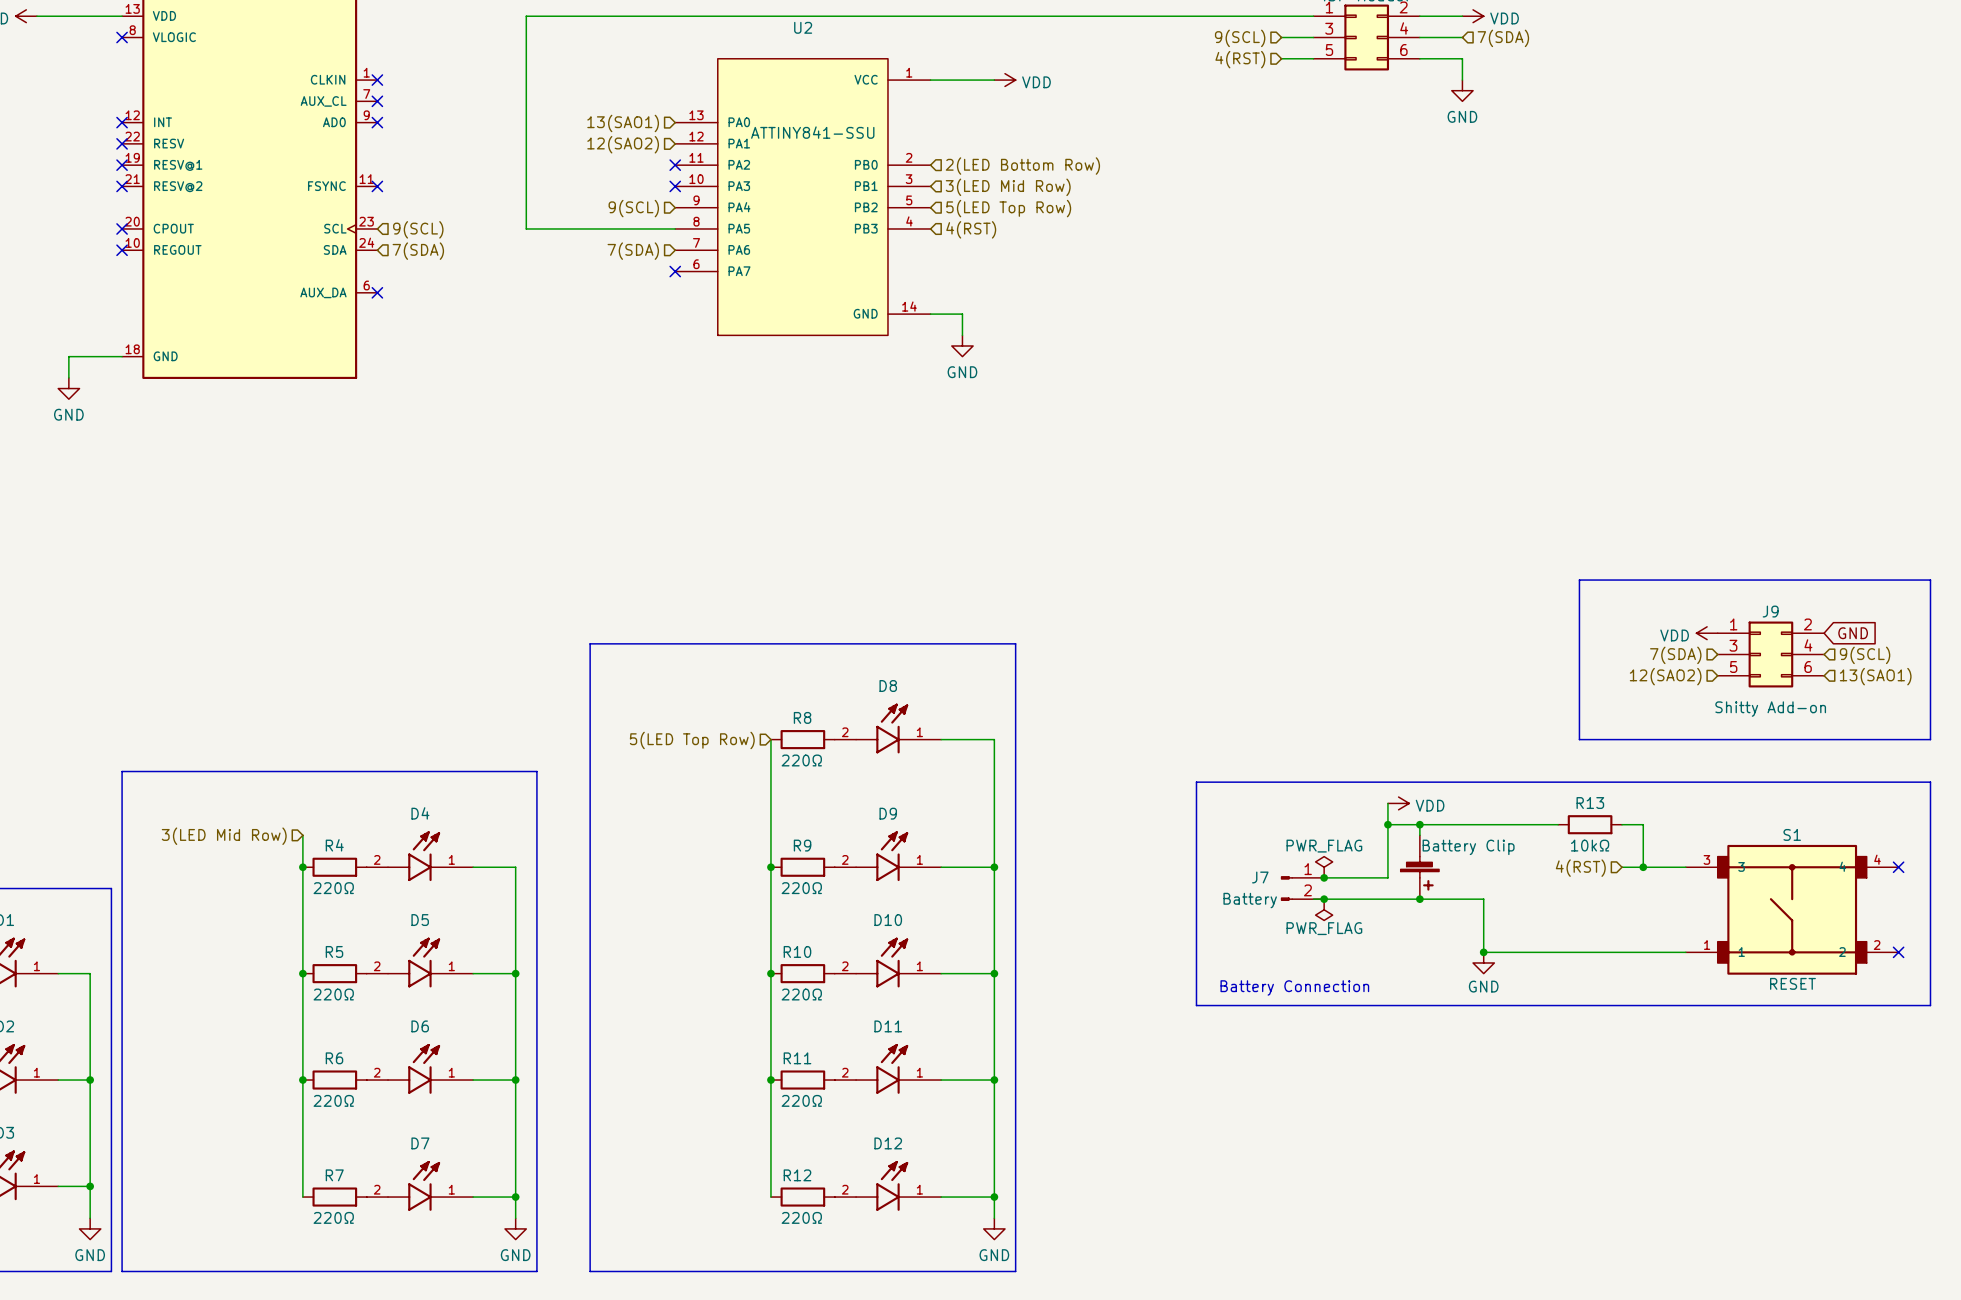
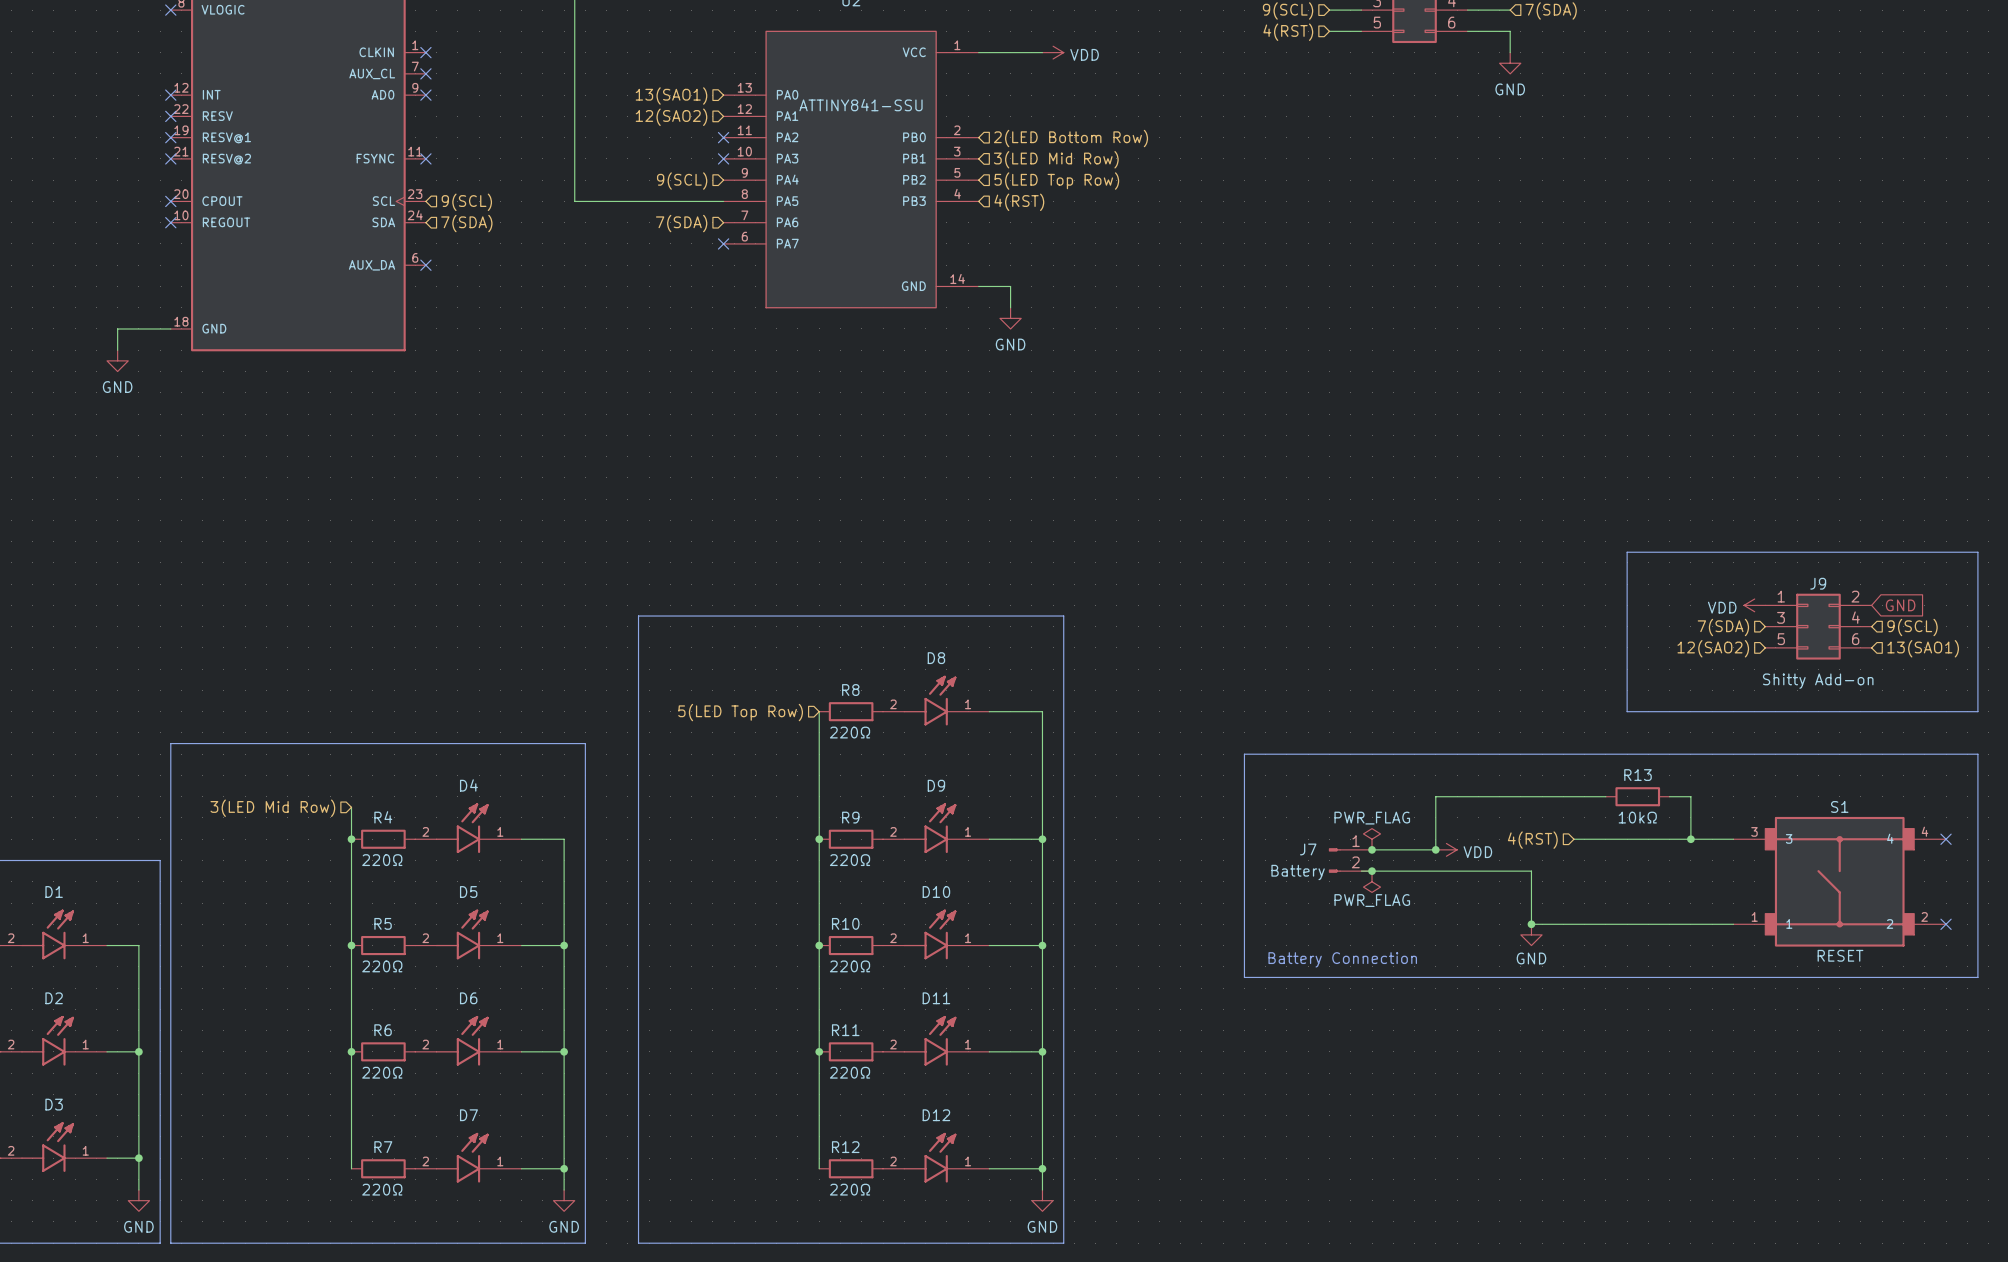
wire: (1387, 803) (1387, 824) -> none
power symbol position: VDD (1398, 803) -> VDD (1446, 849)
junction: (1387, 824) -> none
wire: (1419, 824) (1419, 835) -> none
junction: (1419, 824) -> none
part: Battery Clip (1419, 867) -> none
wire: none -> (1573, 839) (1669, 839)
hierarchical label position: 4(RST) (1580, 868) -> 4(RST) (1532, 840)
junction: none -> (1435, 849)
junction: (1419, 899) -> none

